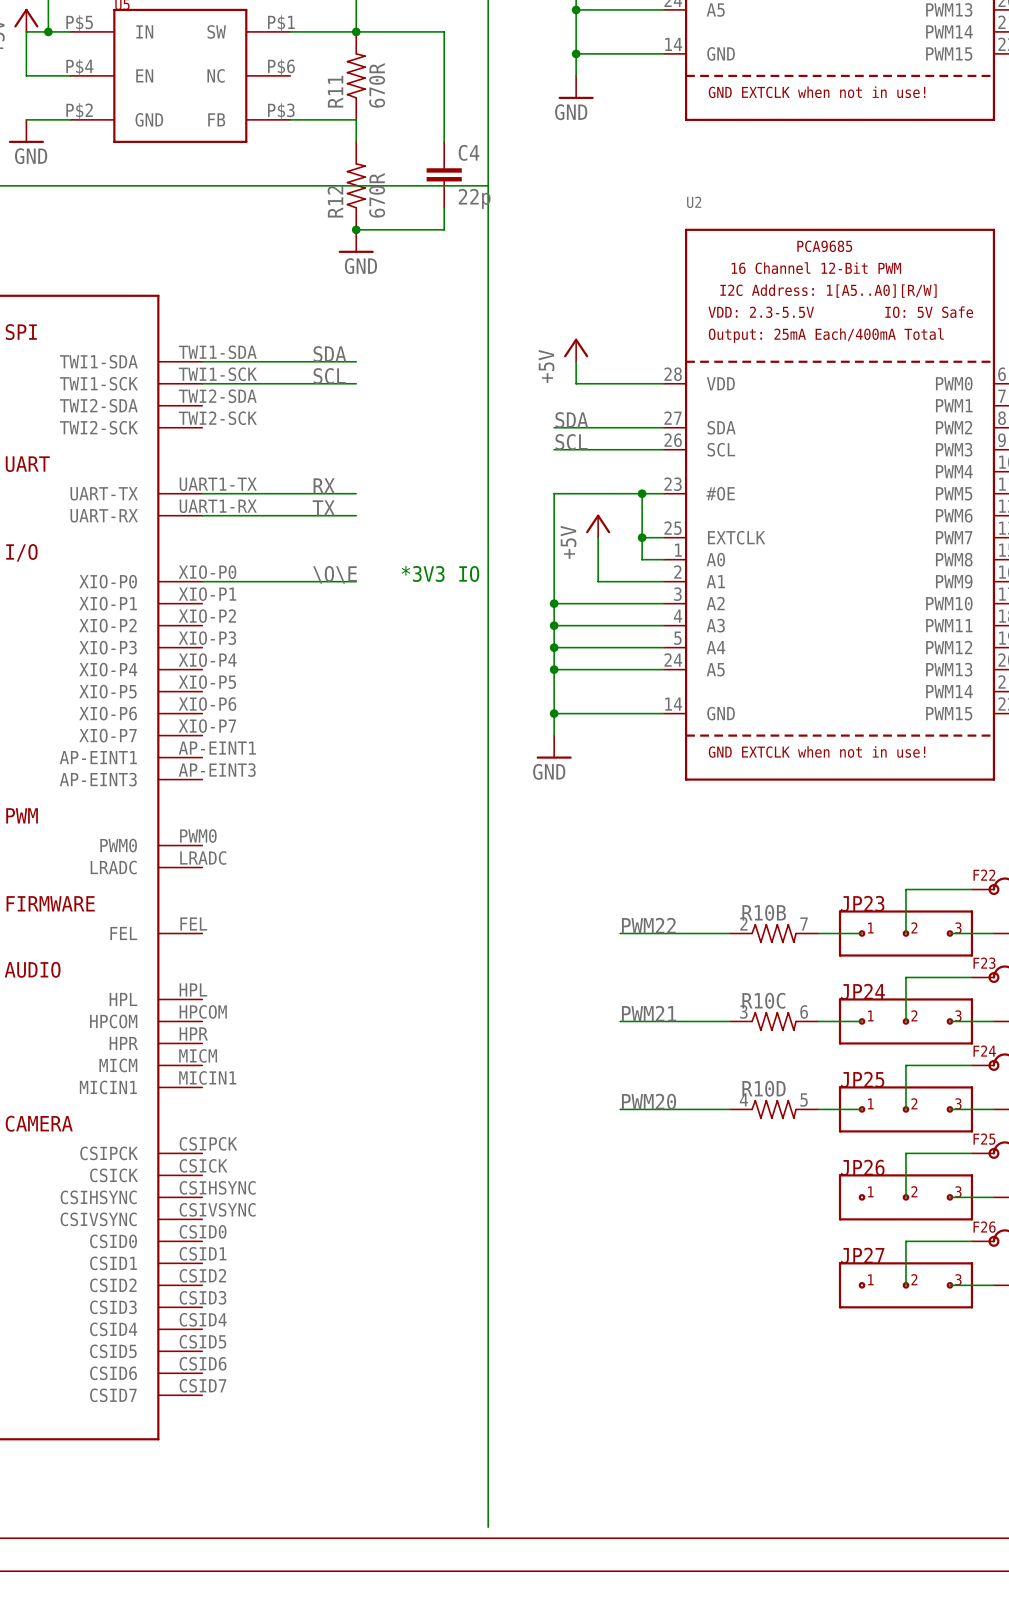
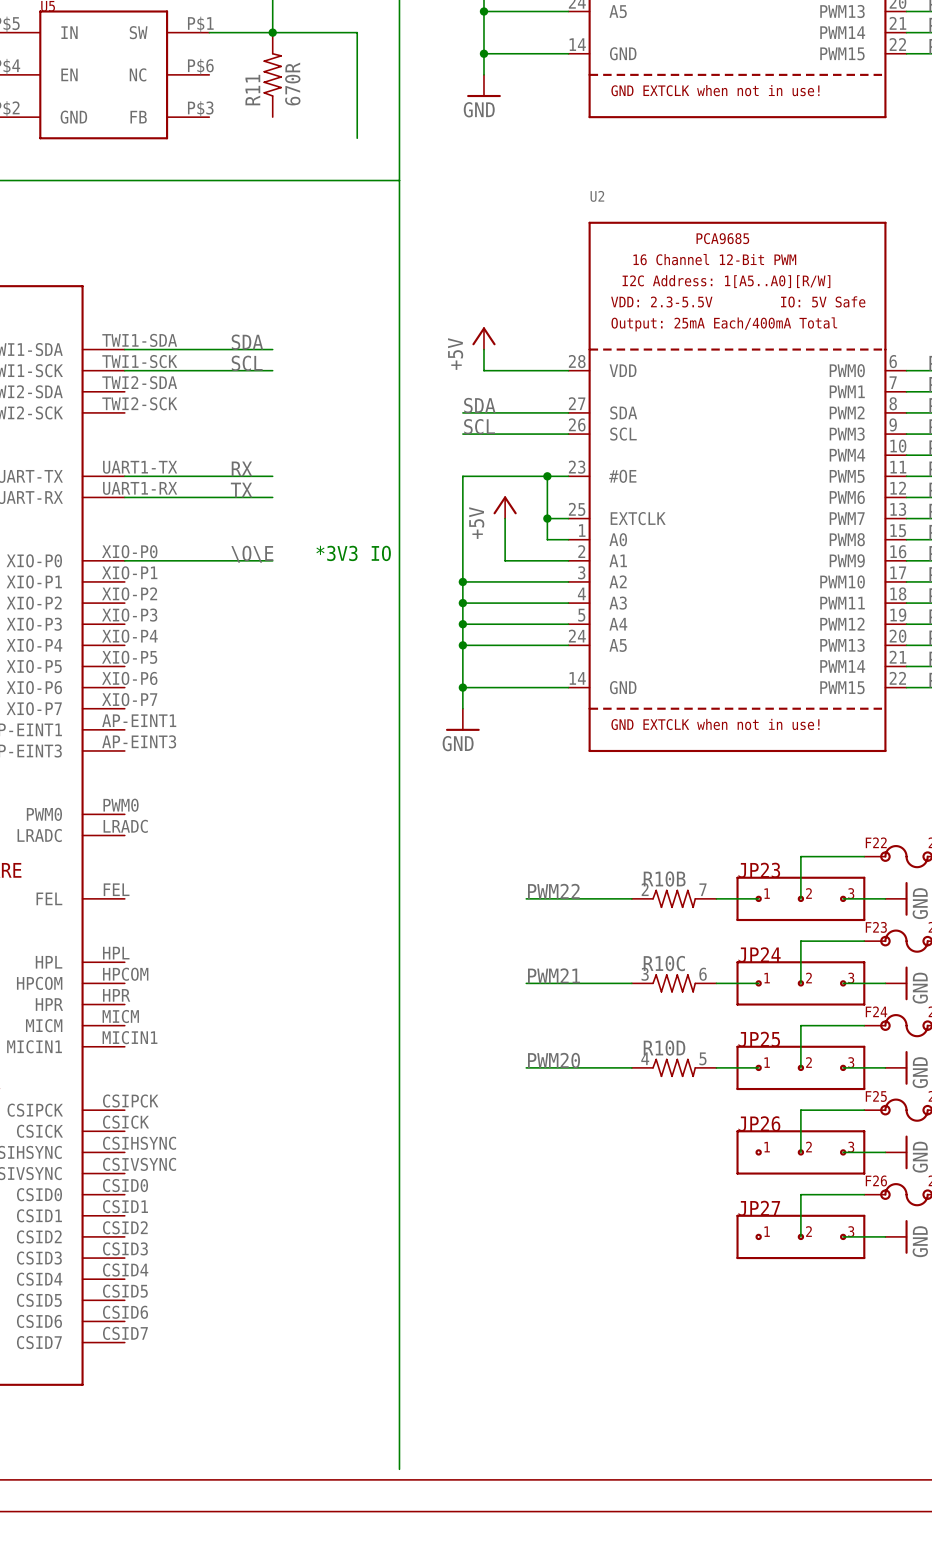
wire: (290, 119) (356, 119) (356, 141) -> none
C4: 22p (444, 174) -> none
R12: 670R (356, 185) -> none
wire: (444, 207) (444, 229) (356, 229) -> none
junction: (356, 229) -> none
power symbol: GND (356, 241) -> none

